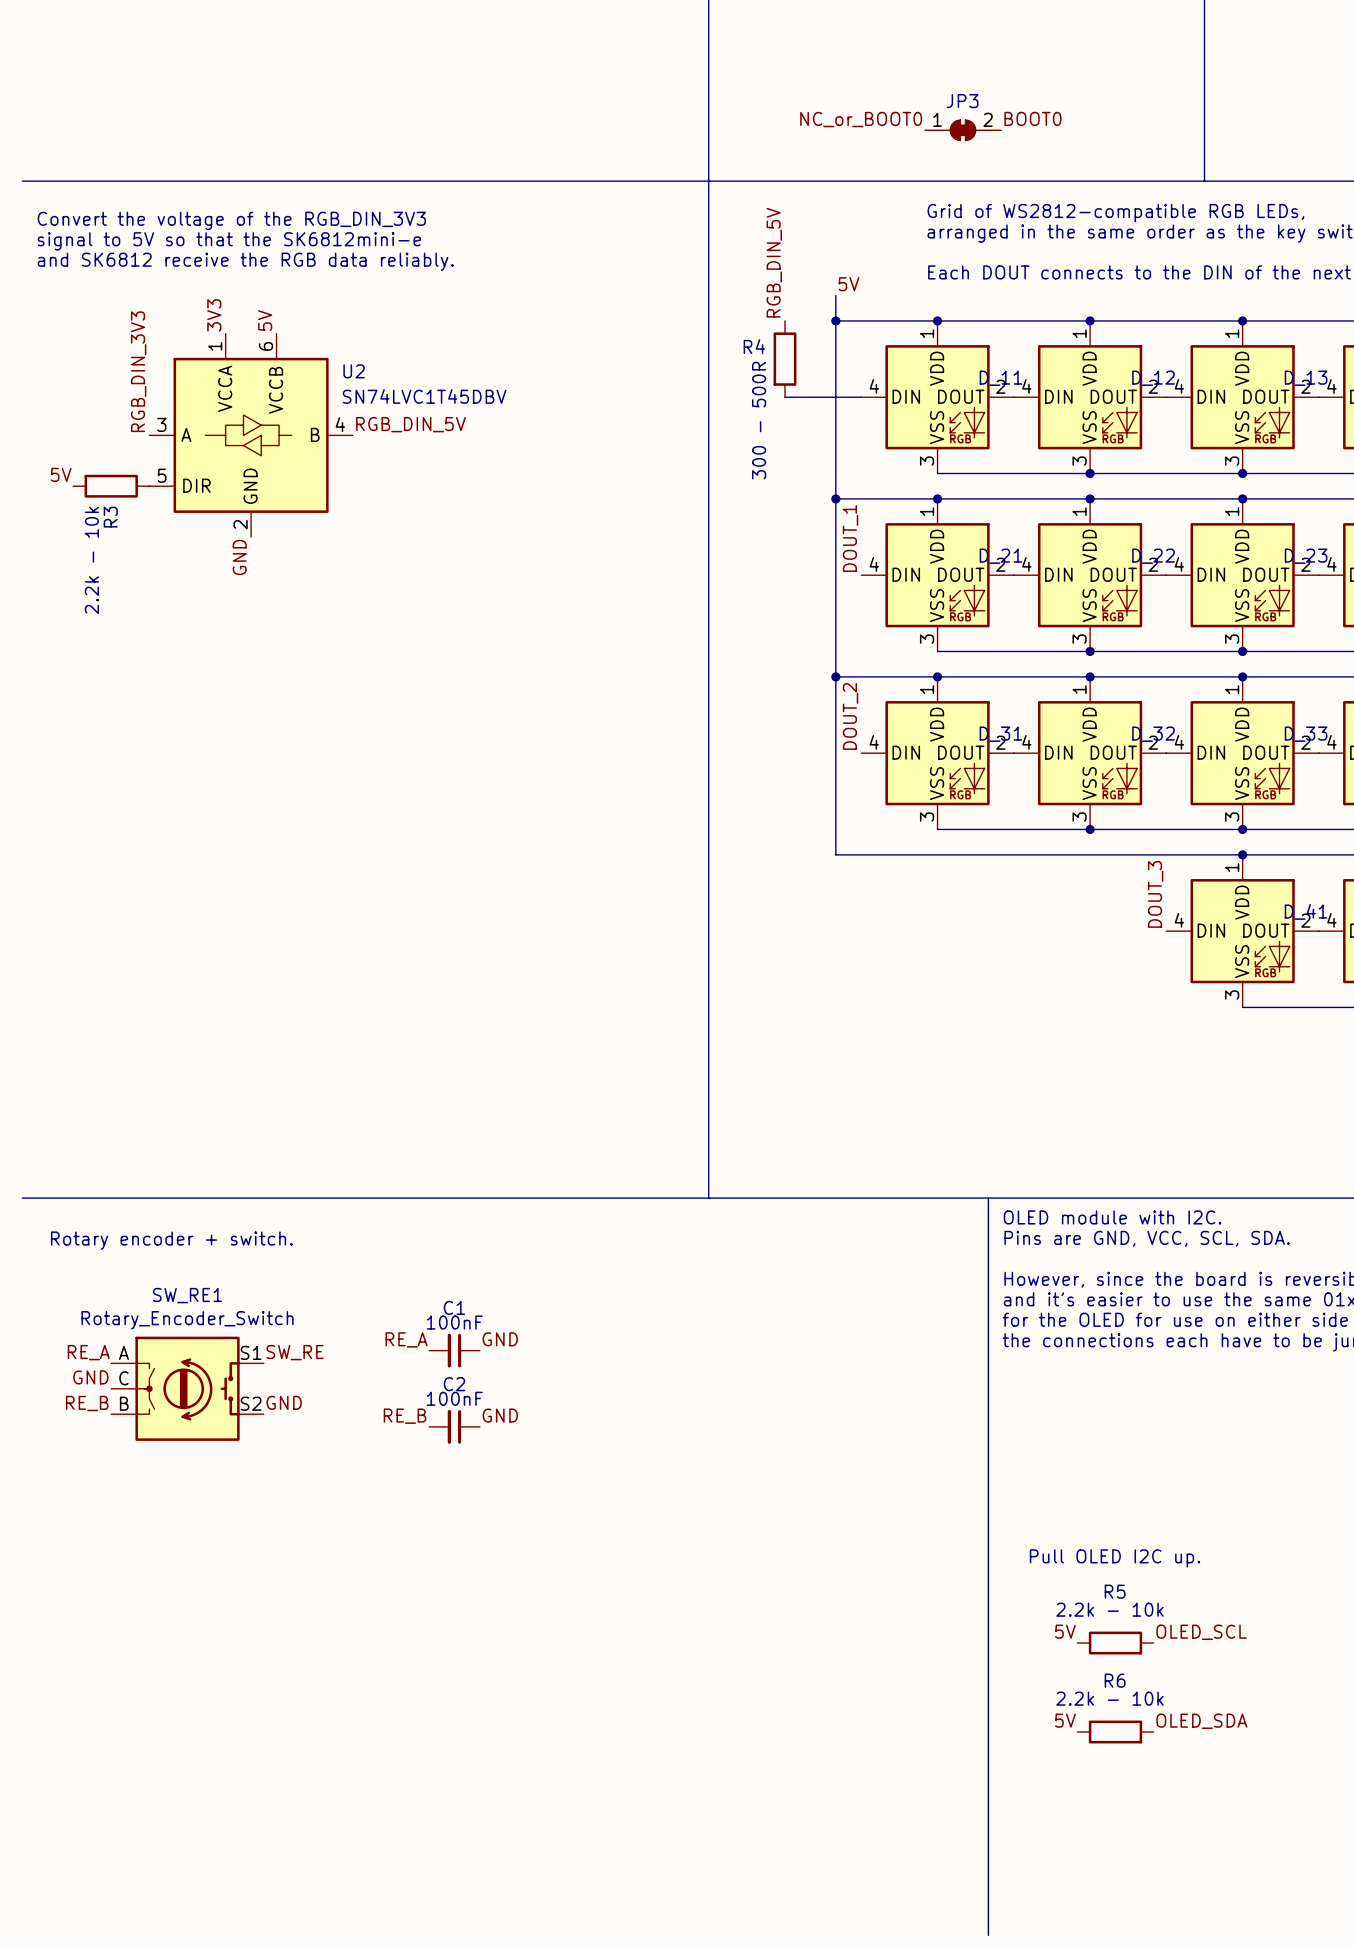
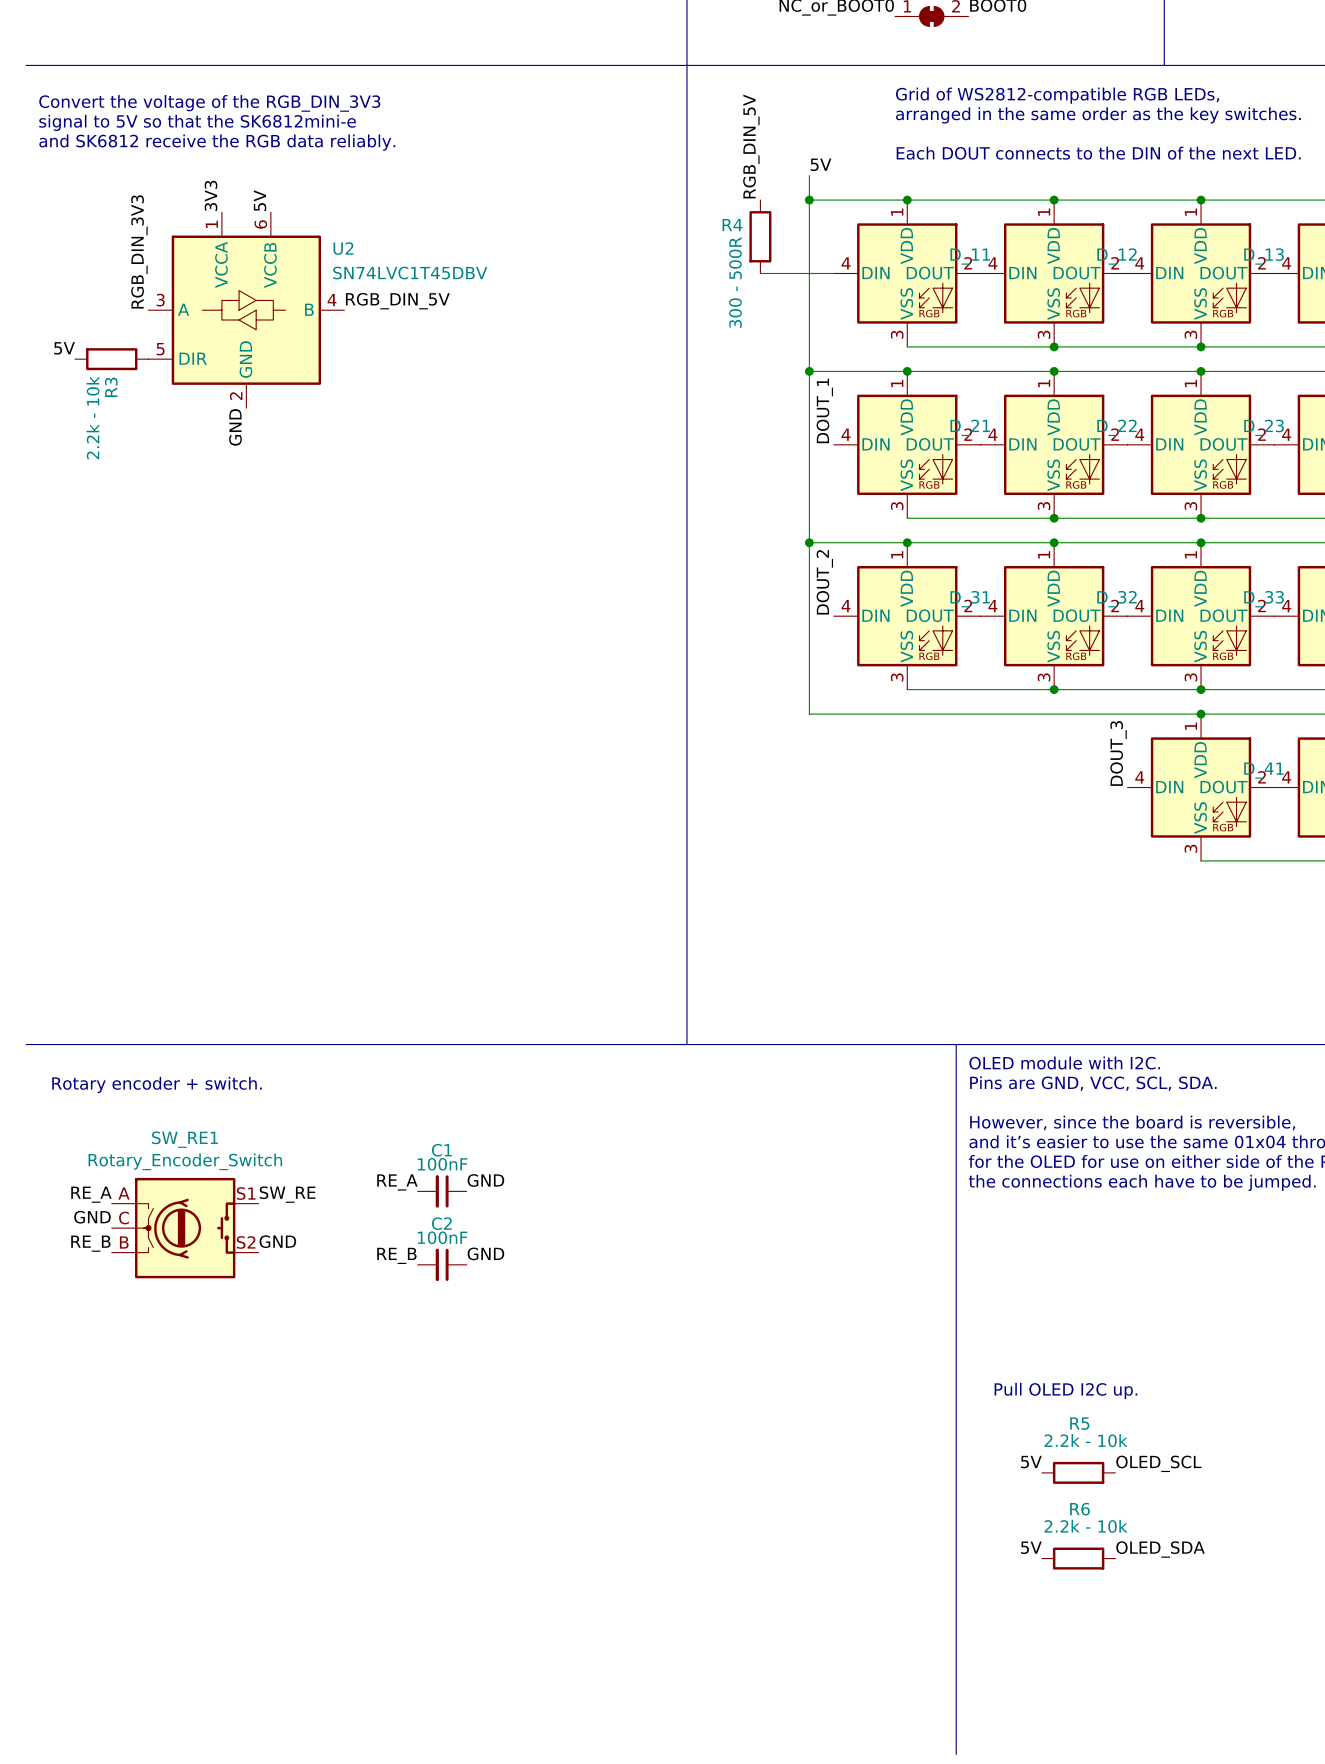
SW_RE1 symbol: [111, 1336, 264, 1441] -> [111, 1177, 259, 1279]

